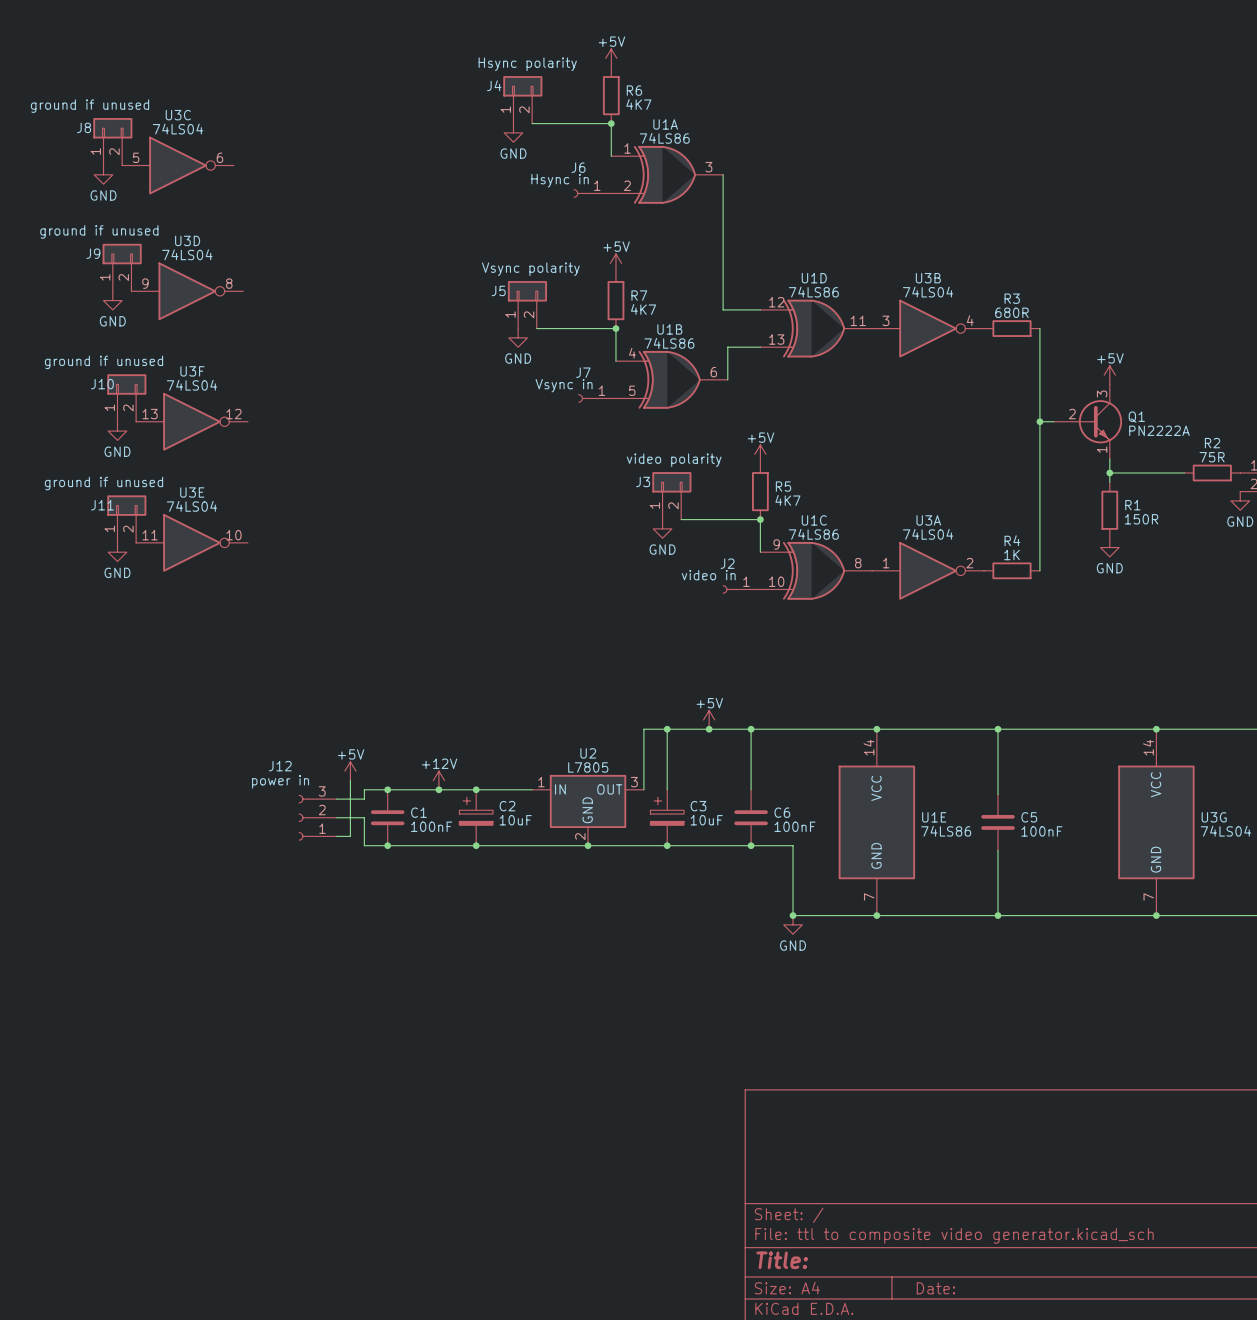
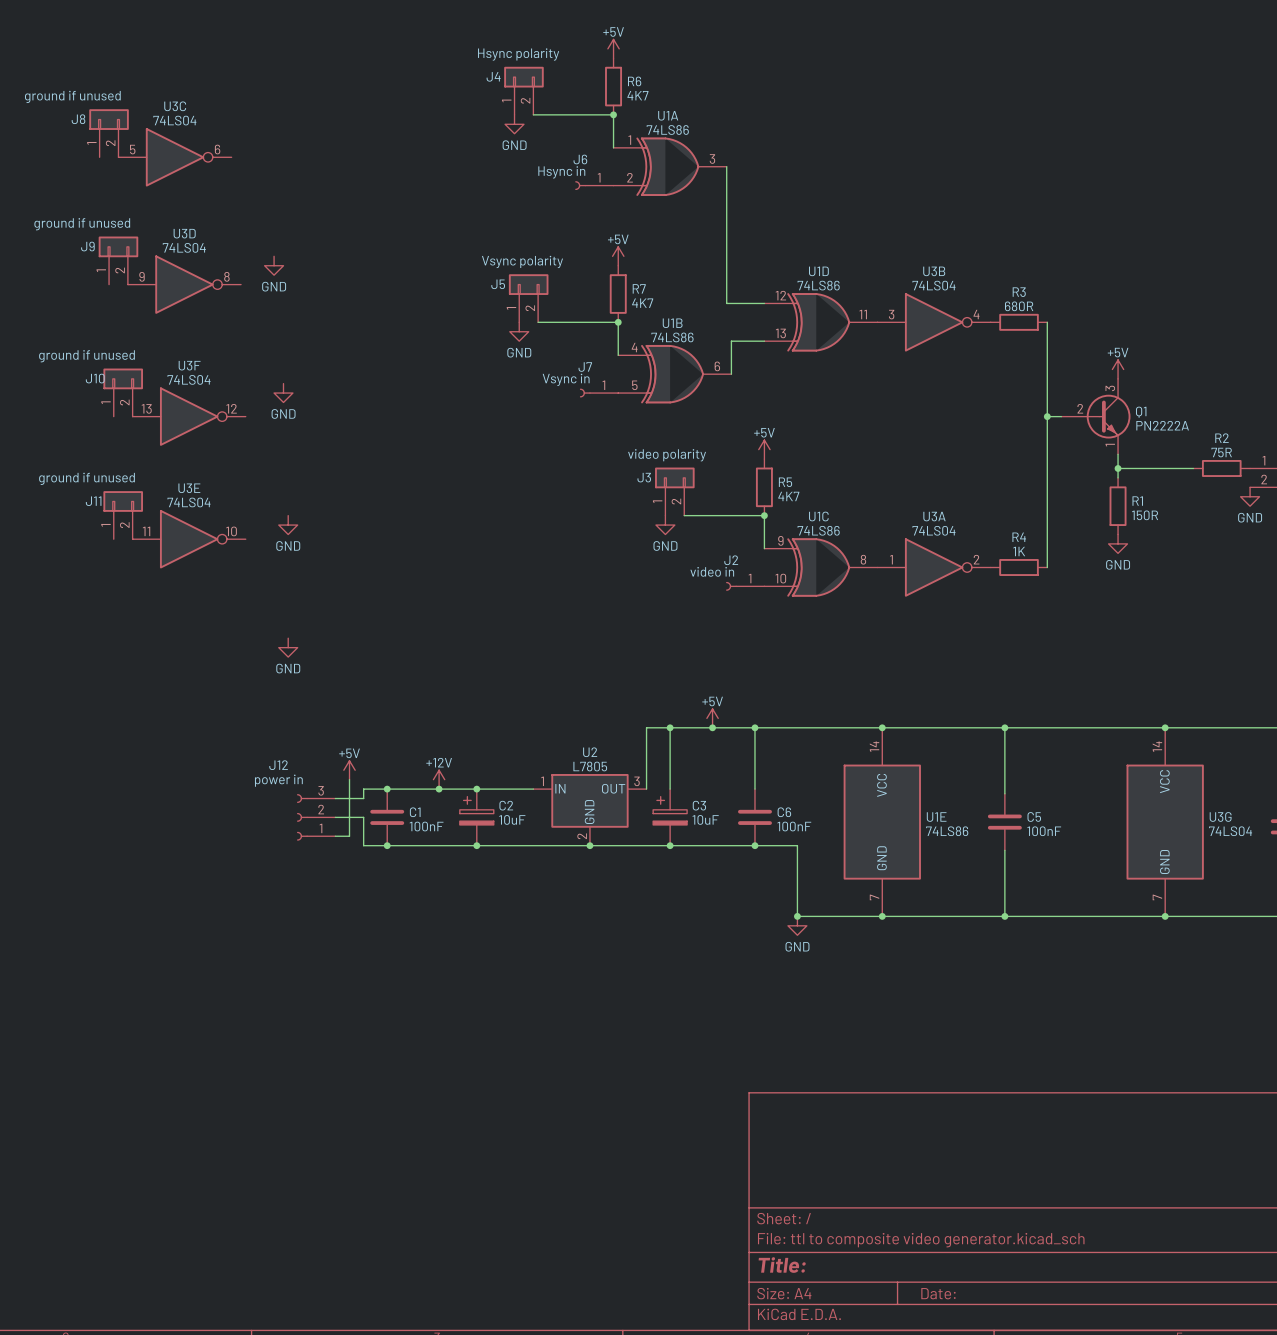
power symbol: GND (103, 174) -> none
power symbol: none -> GND (274, 265)
power symbol: GND (112, 300) -> none
power symbol: none -> GND (283, 393)
power symbol: GND (117, 431) -> none
power symbol: none -> GND (288, 525)
power symbol: GND (117, 552) -> none
power symbol: none -> GND (288, 647)

